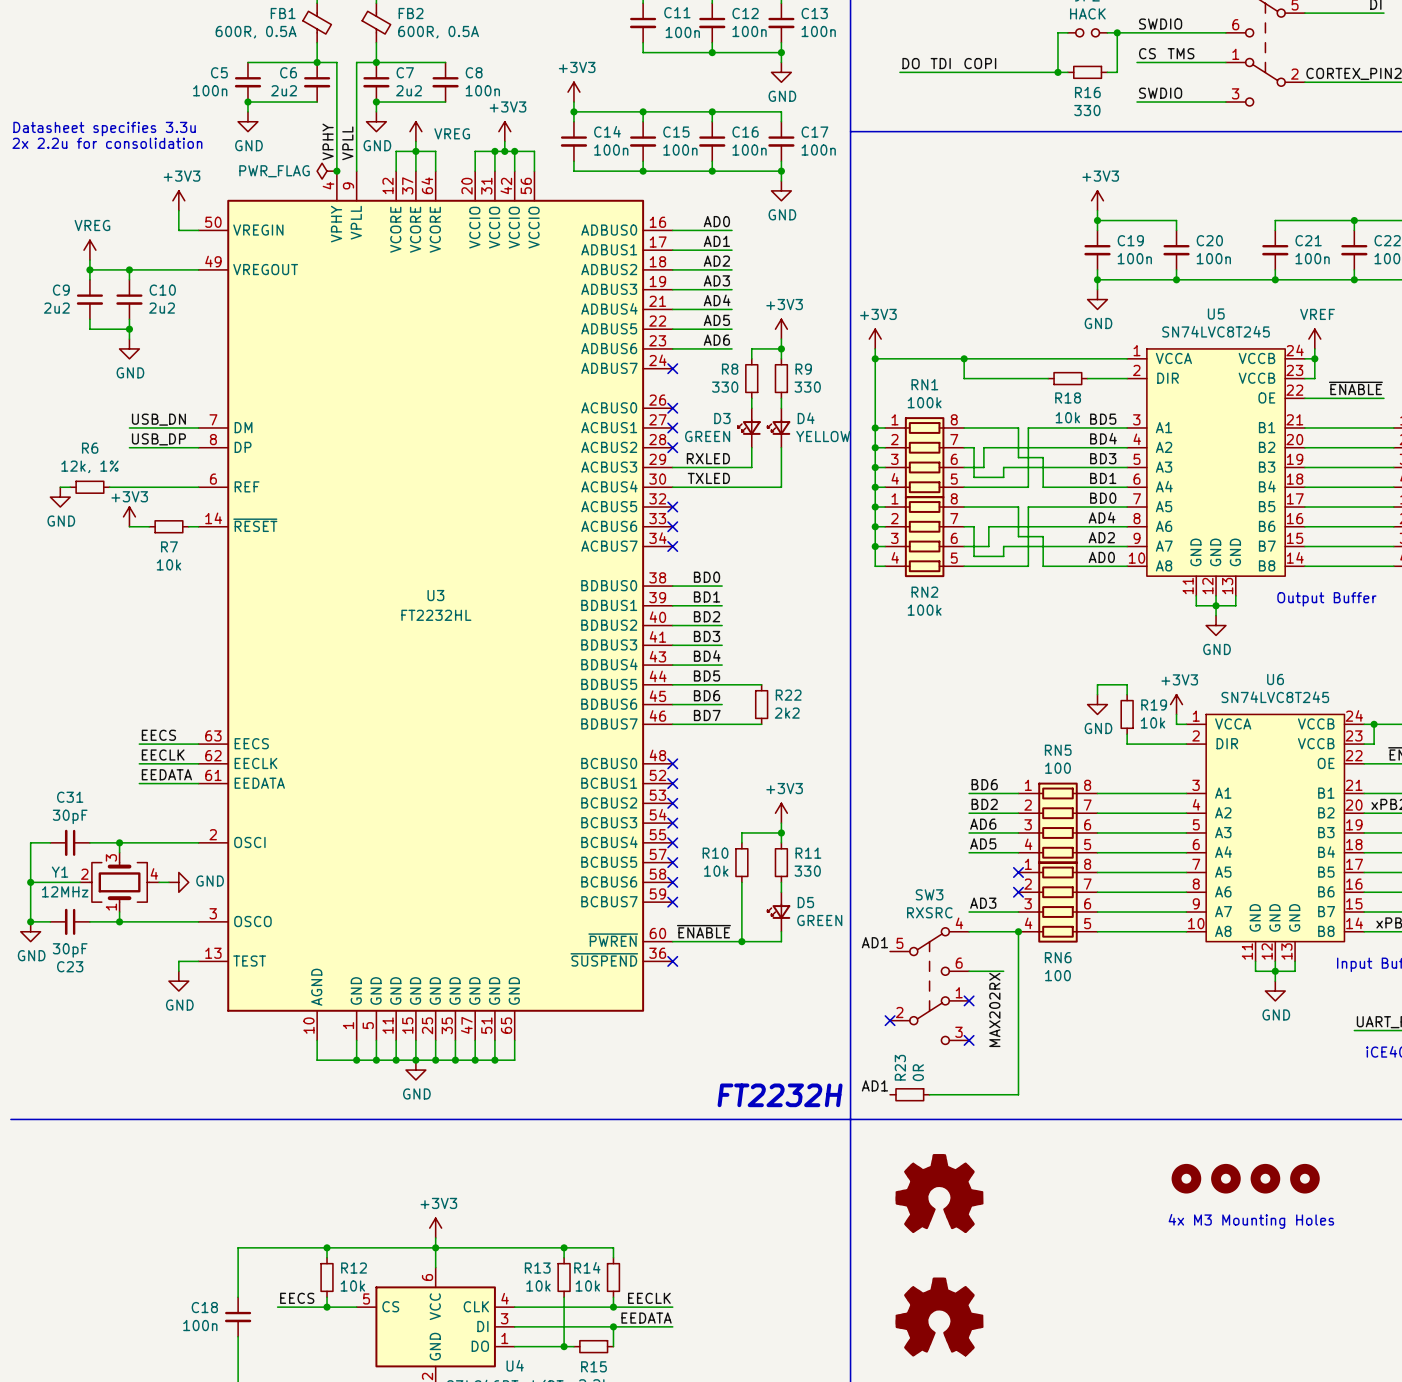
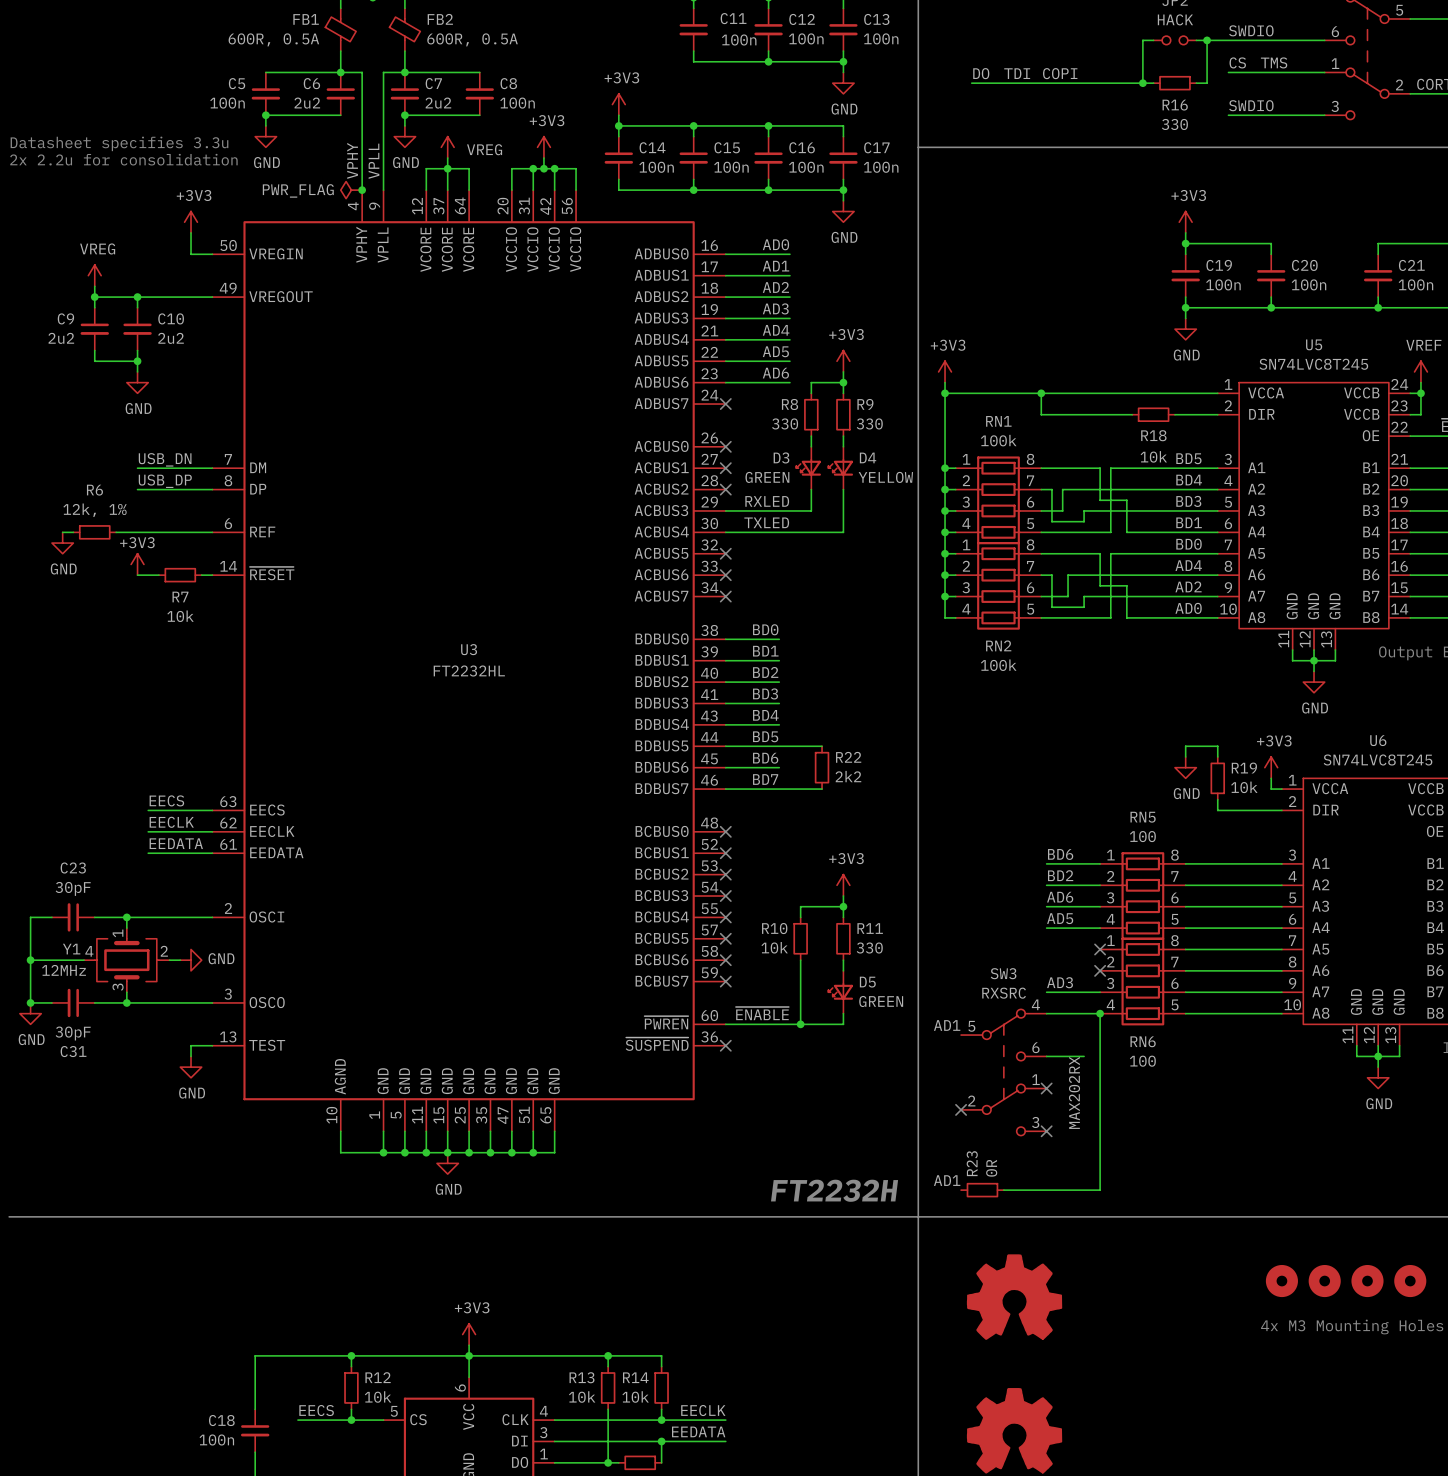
C31 name: C31 (70, 797) -> C23 (73, 868)
Y1 rotation: 0° (119, 882) -> 180° (126, 960)
C23 name: C23 (70, 966) -> C31 (73, 1051)

